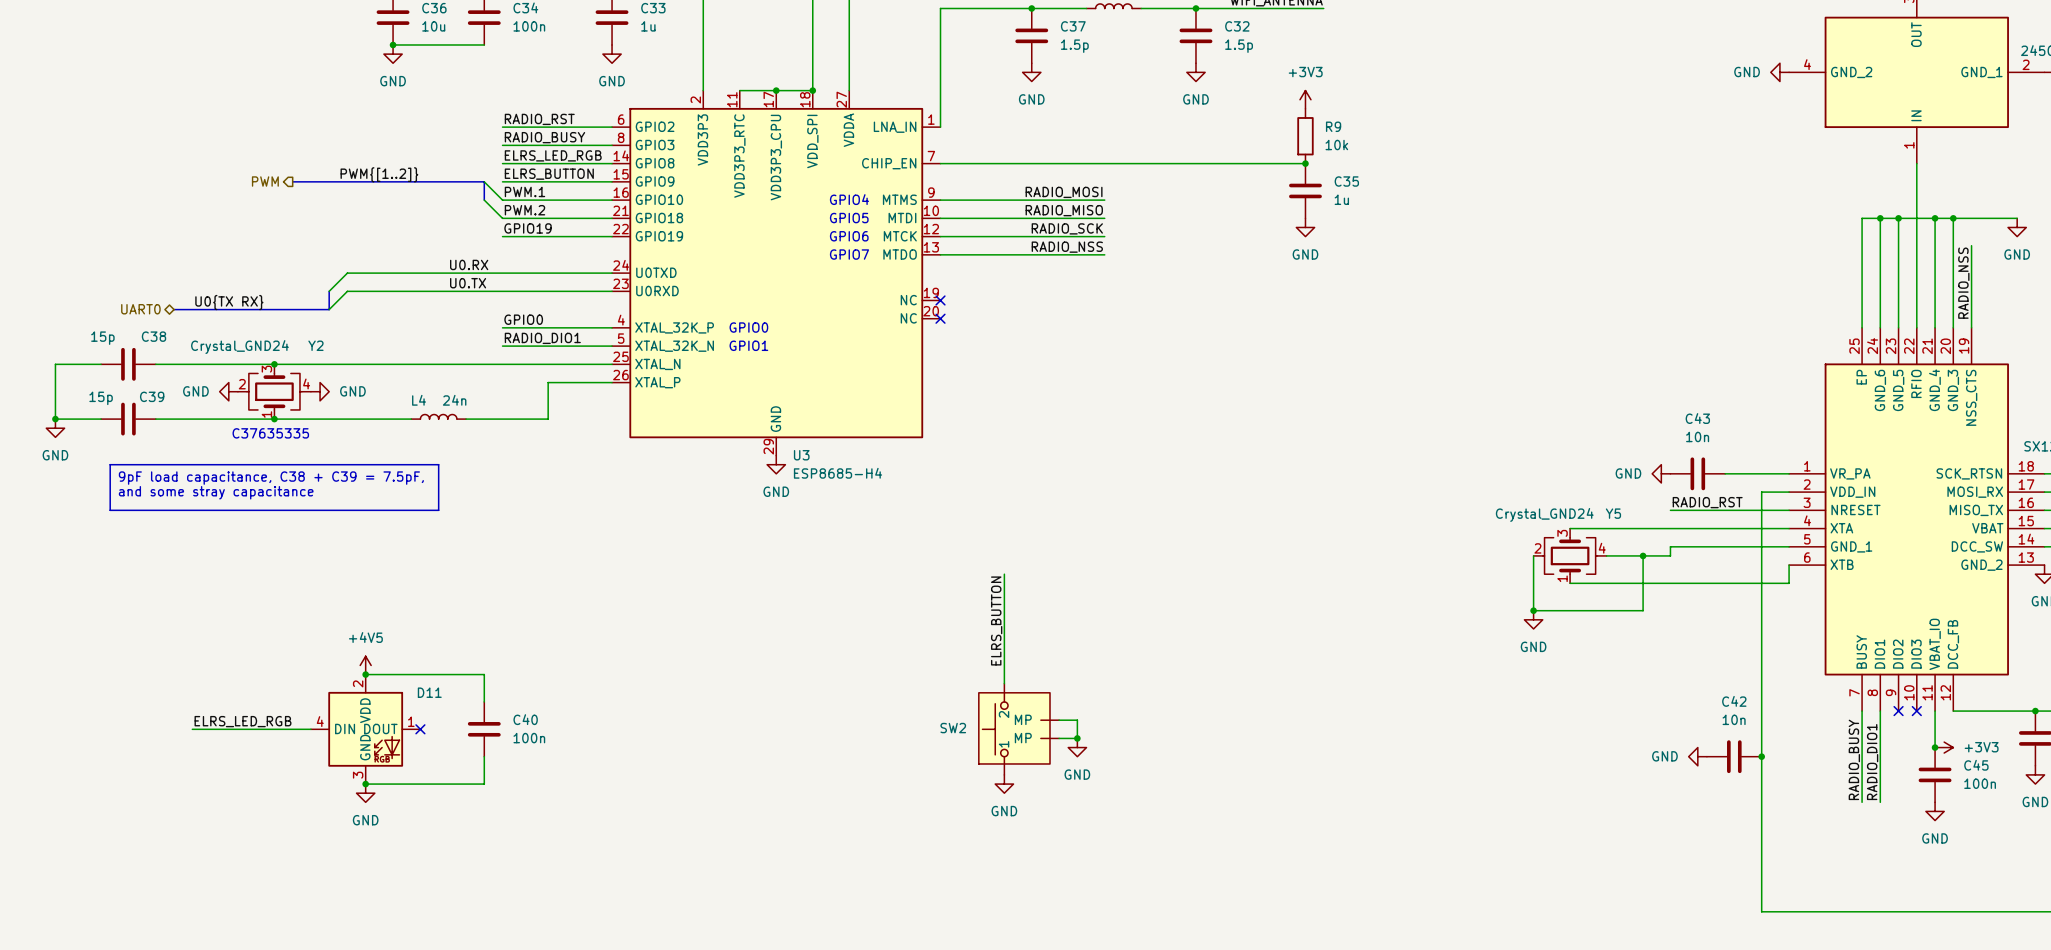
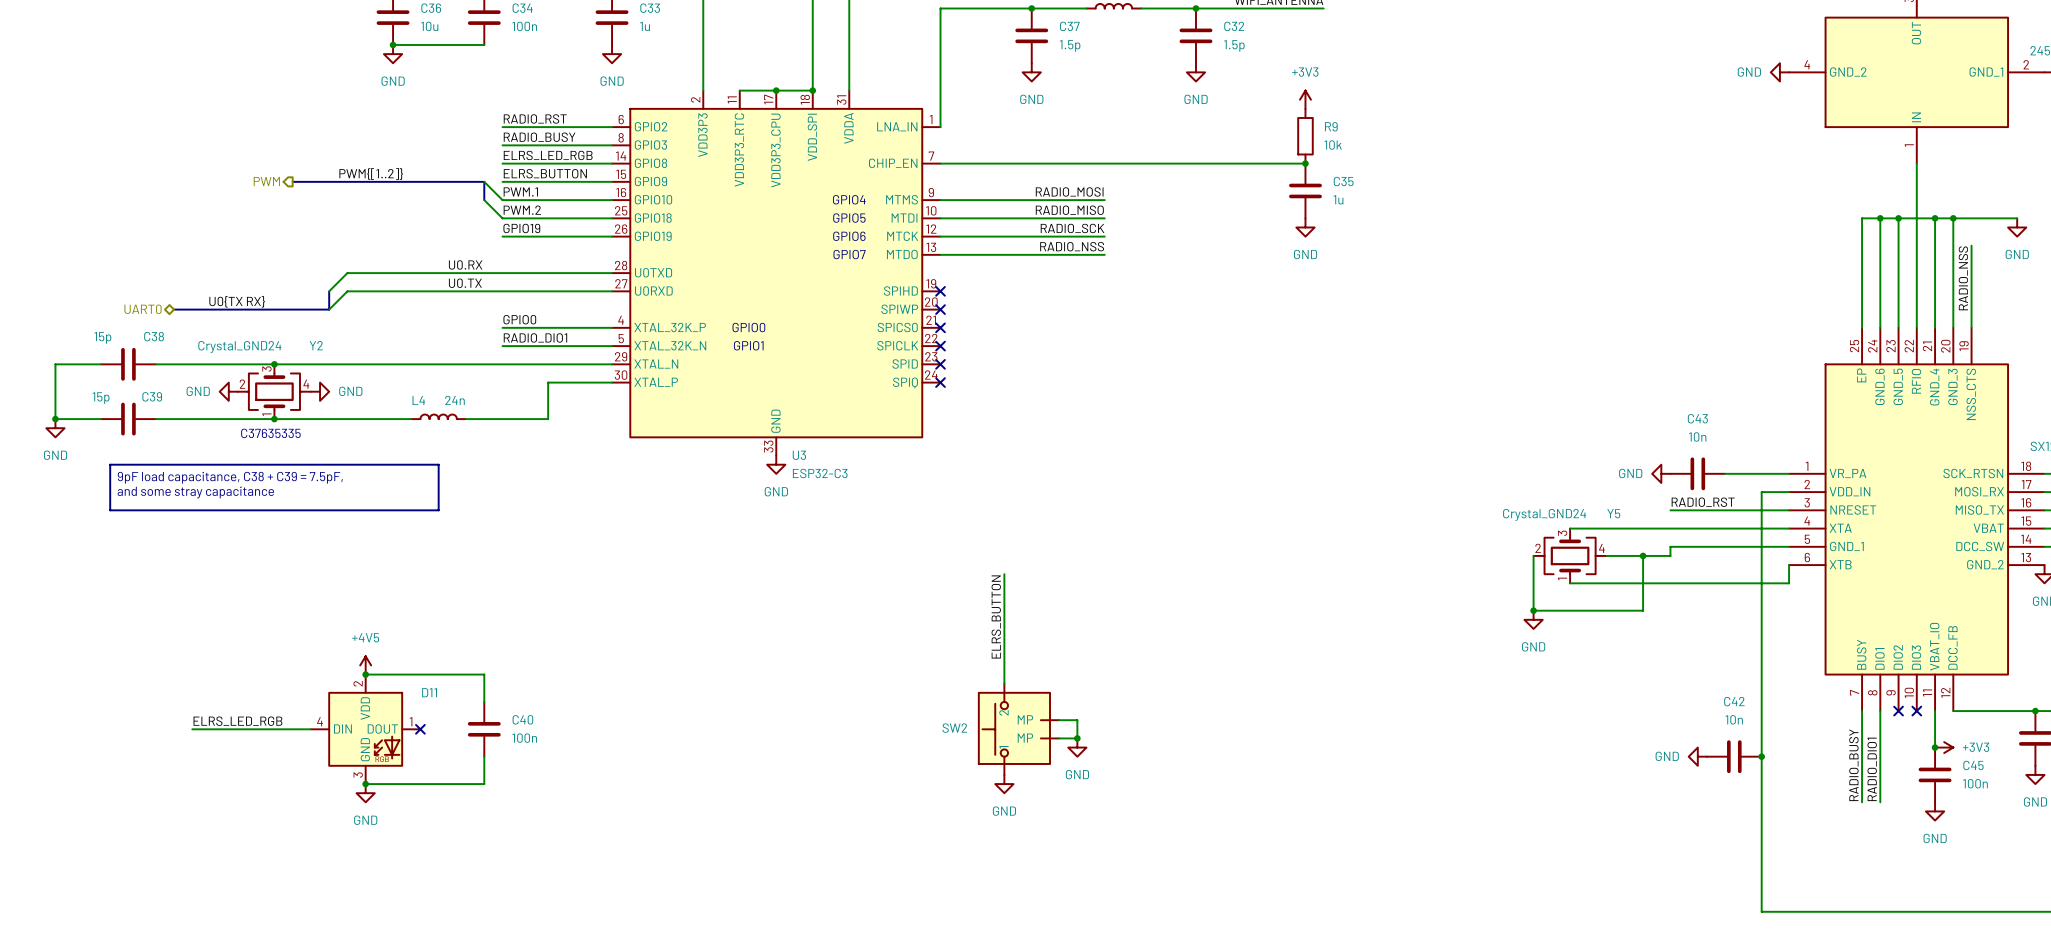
U3 symbol: [612, 90, 941, 456] -> [612, 90, 941, 456]
no-connect mark: none -> (940, 291)
no-connect mark: (940, 300) -> none
no-connect mark: none -> (940, 309)
no-connect mark: (940, 318) -> none
no-connect mark: none -> (940, 327)
no-connect mark: none -> (940, 346)
no-connect mark: none -> (940, 364)
no-connect mark: none -> (940, 382)
U3 value: ESP8685-H4 (838, 473) -> ESP32-C3 (820, 473)

